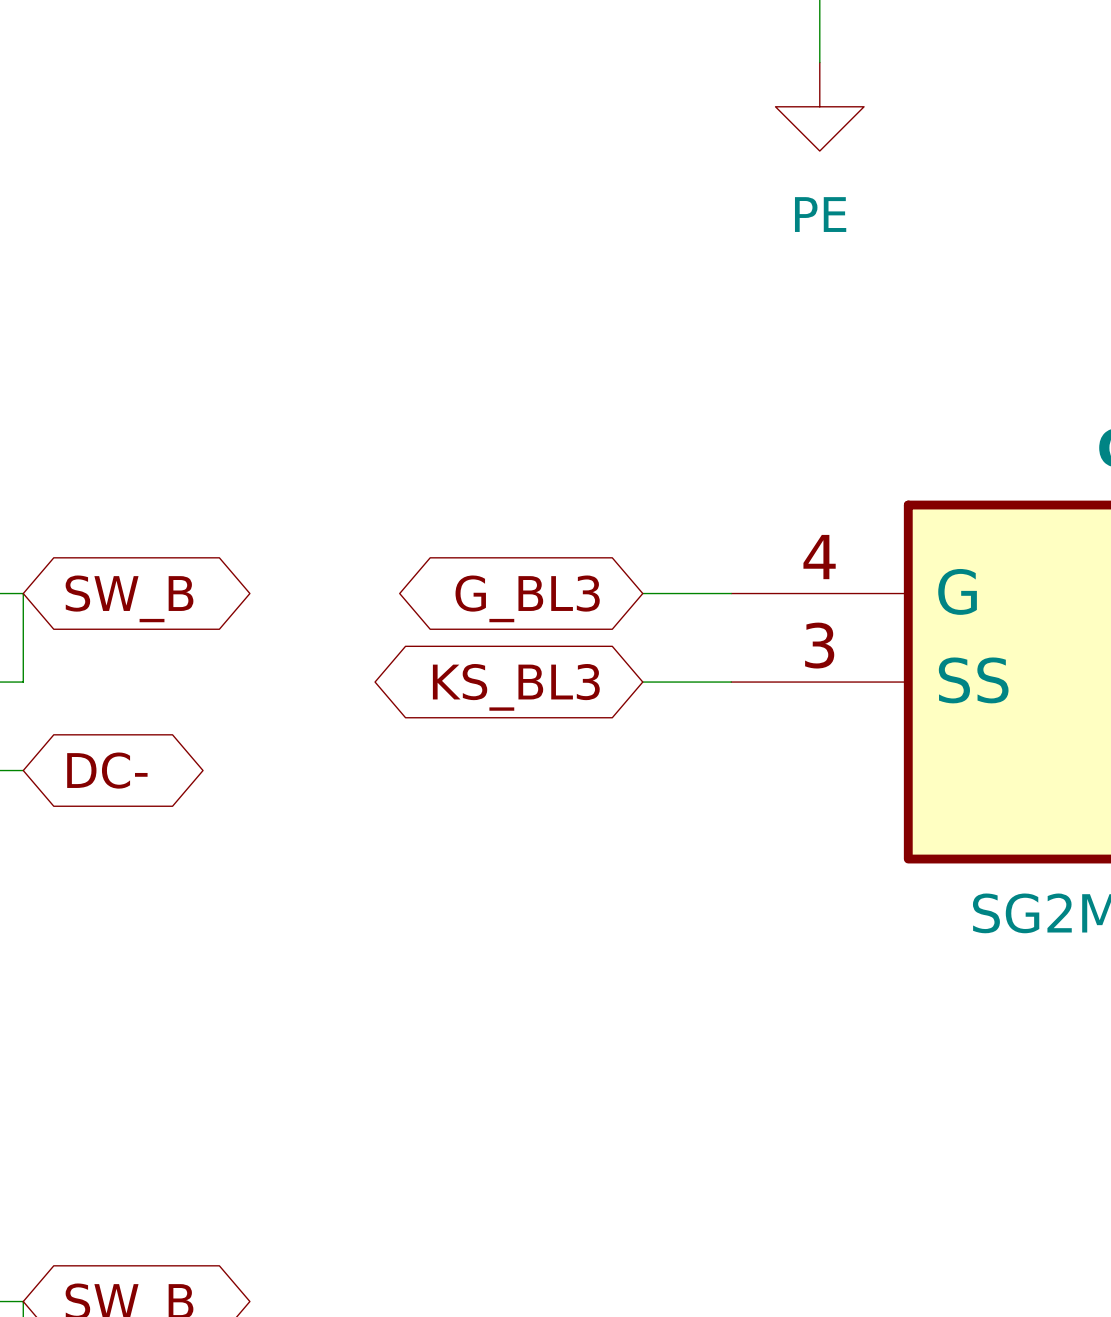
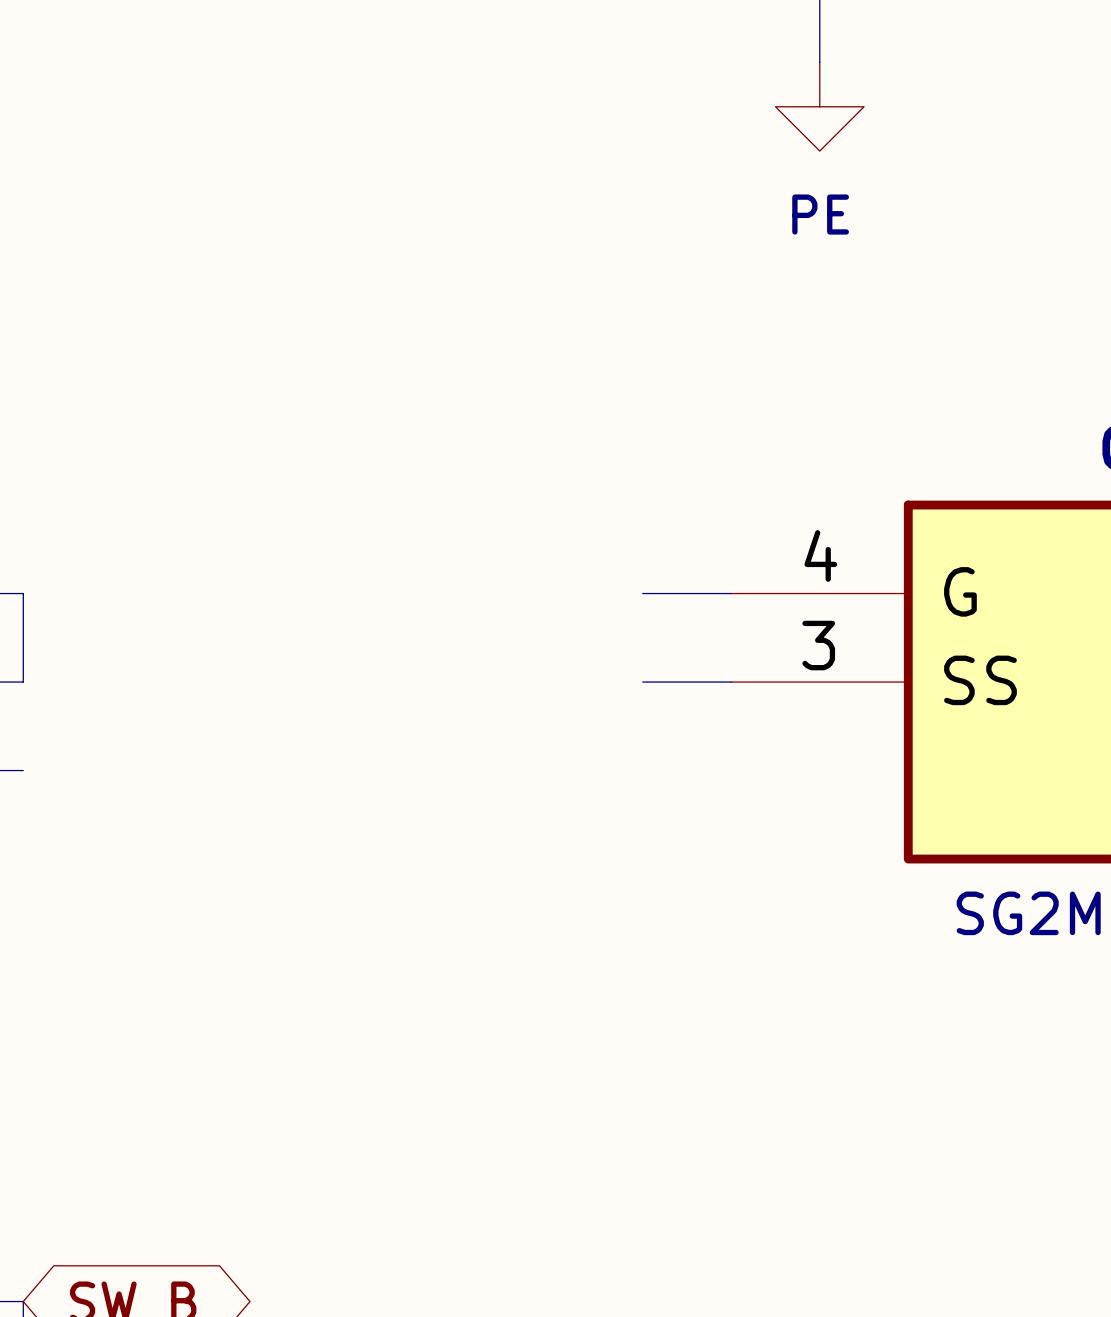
global label: SW_B (129, 598) -> none
global label: G_BL3 (527, 598) -> none
global label: KS_BL3 (516, 687) -> none
global label: DC- (107, 770) -> none

